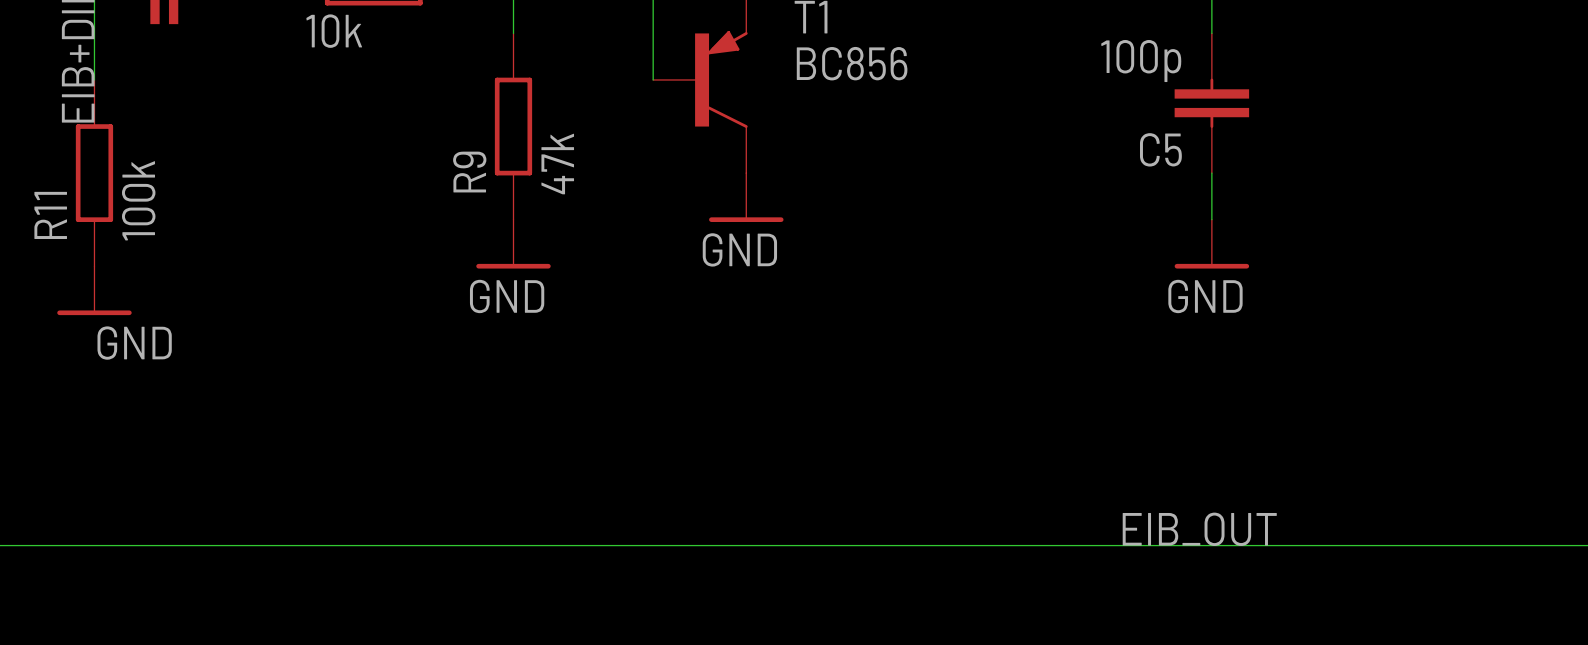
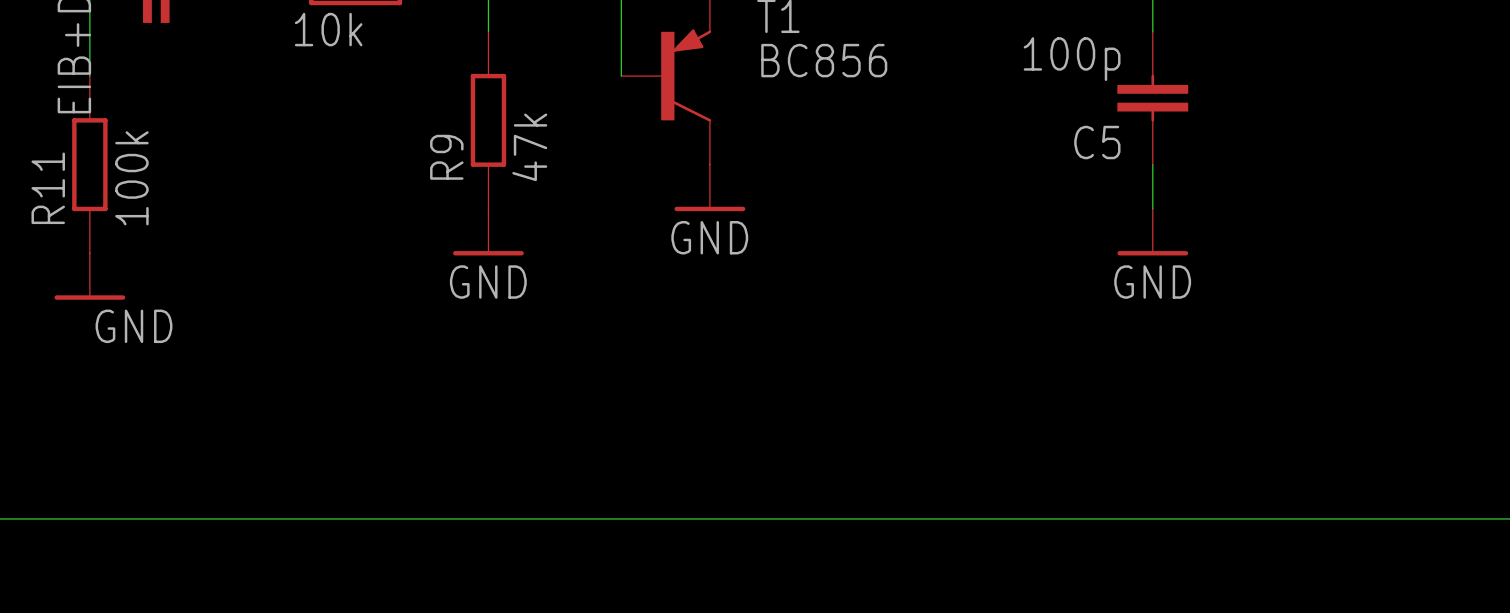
label: EIB_OUT (1199, 529) -> none

